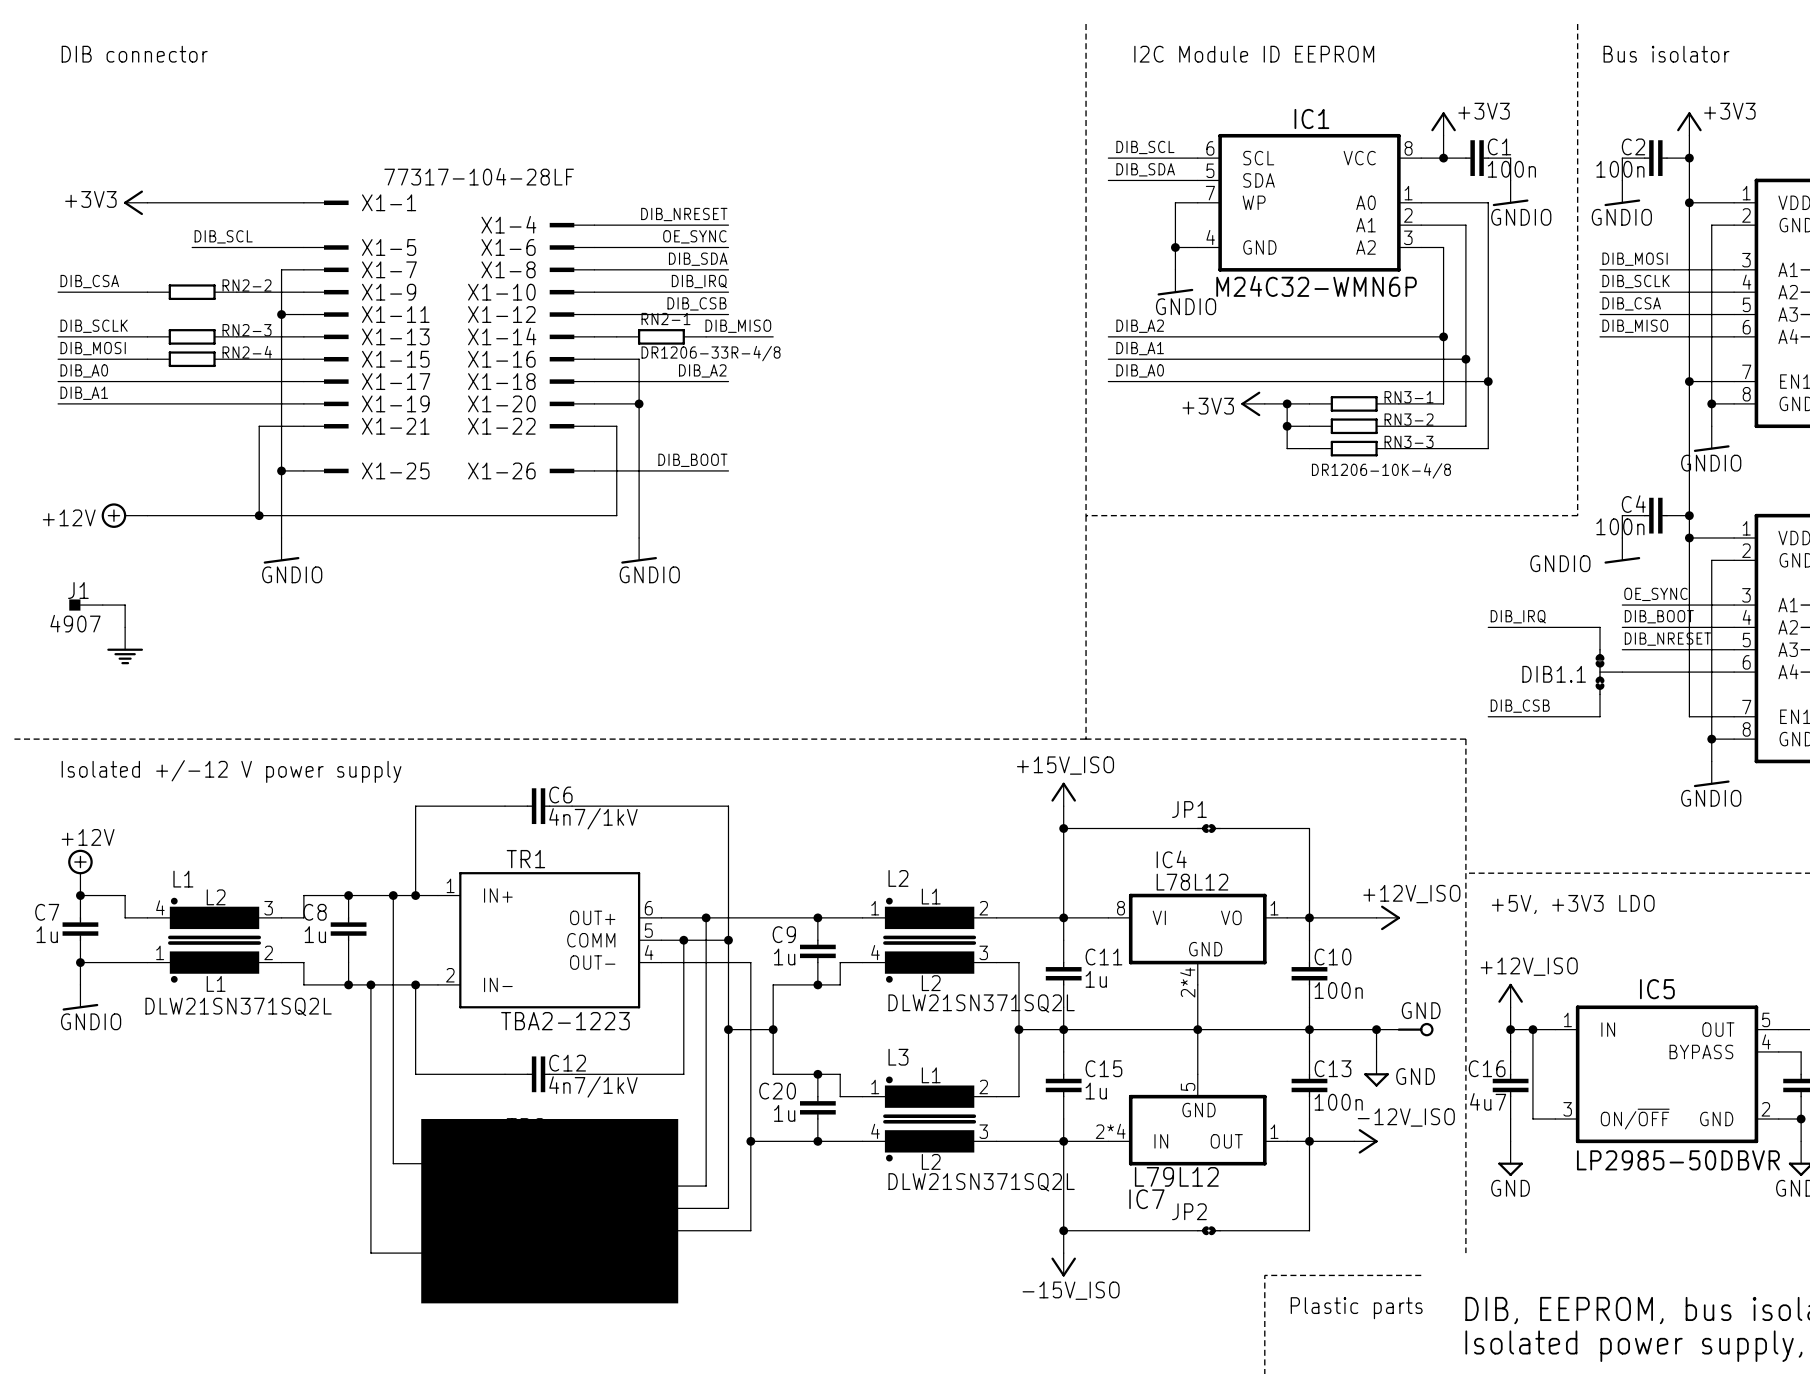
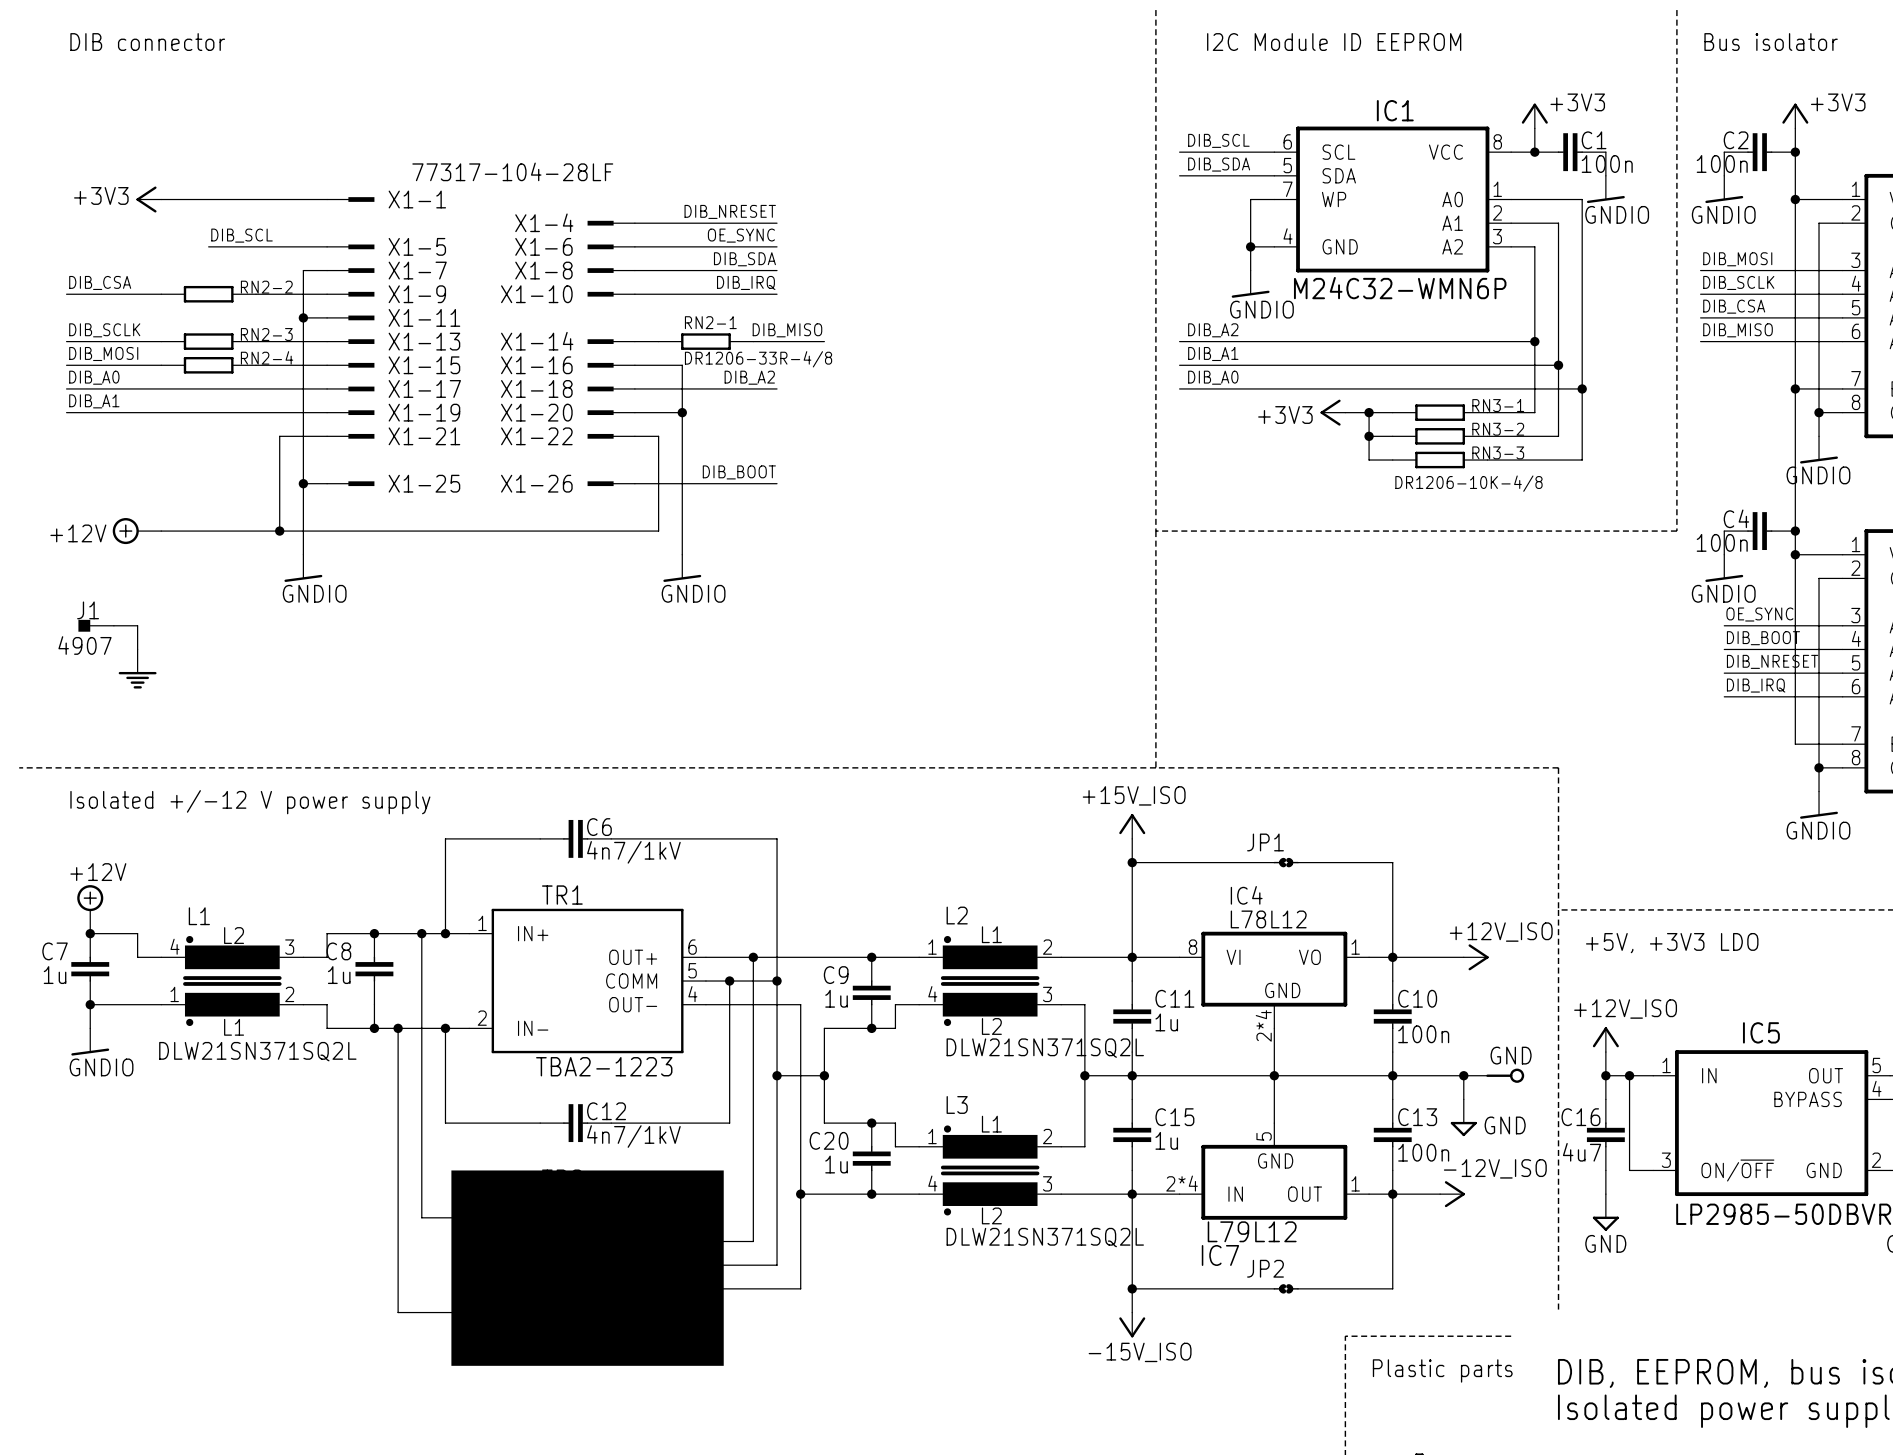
label: DIB_CSB (697, 303) -> none
X1-12: (572, 314) -> none
wire: (594, 314) (728, 314) -> none
power symbol text position: GNDIO (1560, 563) -> GNDIO (1723, 593)
label position: DIB_IRQ (1518, 616) -> DIB_IRQ (1756, 685)
wire: (1488, 627) (1600, 627) (1600, 649) -> none
DIB1.1: (1608, 672) -> none
wire: (1600, 694) (1600, 716) (1488, 716) -> none
label: DIB_CSB (1520, 706) -> none

